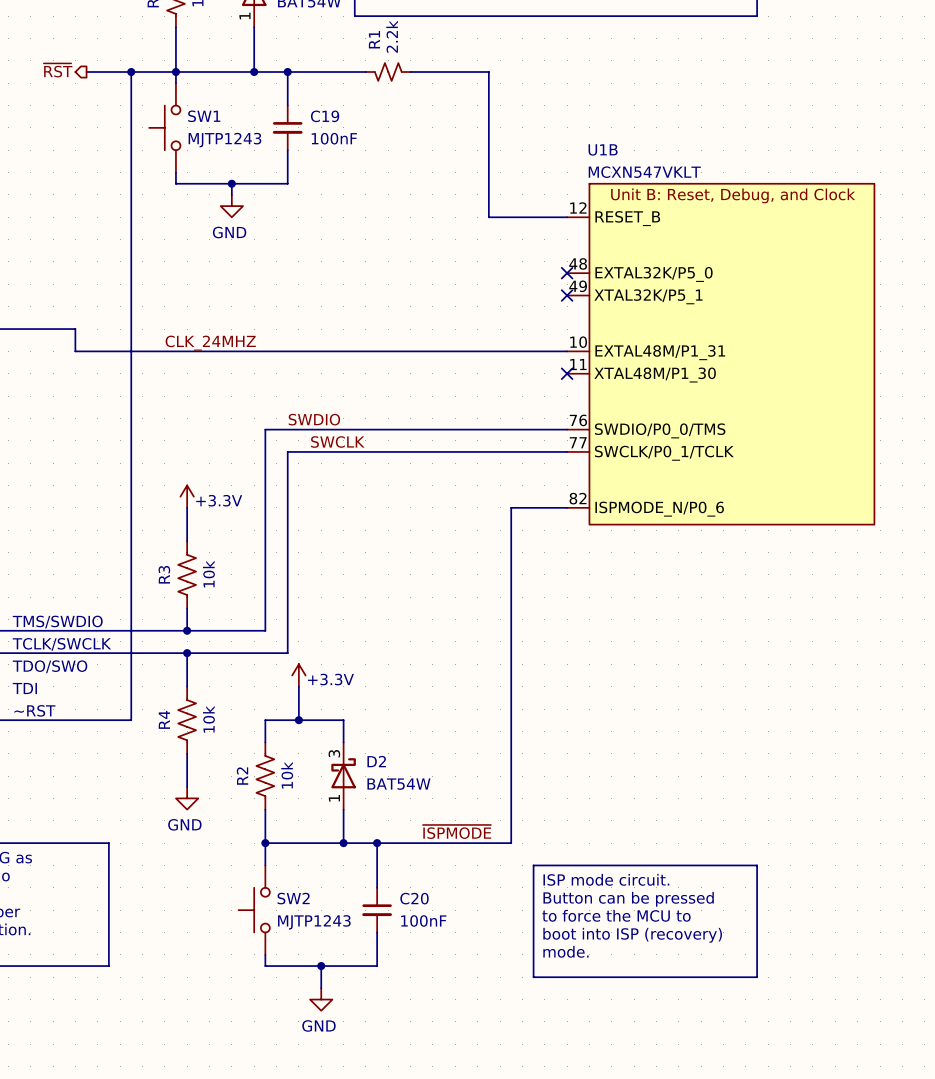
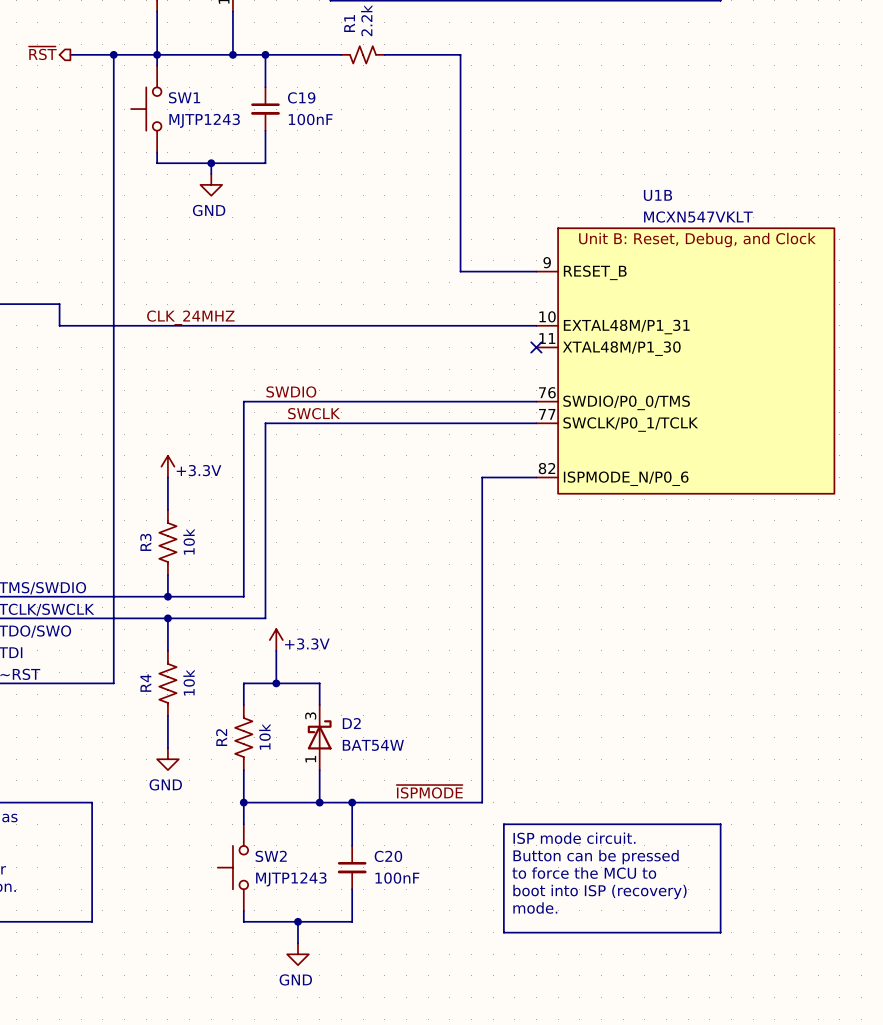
U1B name position: U1B (603, 149) -> U1B (657, 195)
U1B value position: MCXN547VKLT (644, 172) -> MCXN547VKLT (698, 217)
U1B symbol: [567, 183, 875, 525] -> [536, 228, 835, 494]
wire: (488, 217) (567, 217) -> (460, 195) (460, 271) (536, 271)
no-connect mark: (567, 273) -> none
no-connect mark: (567, 295) -> none

